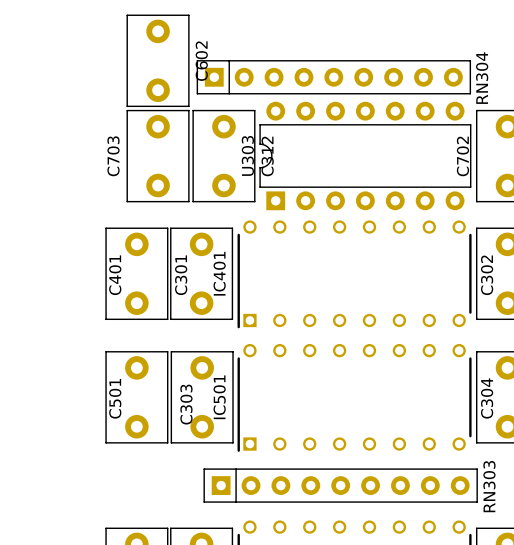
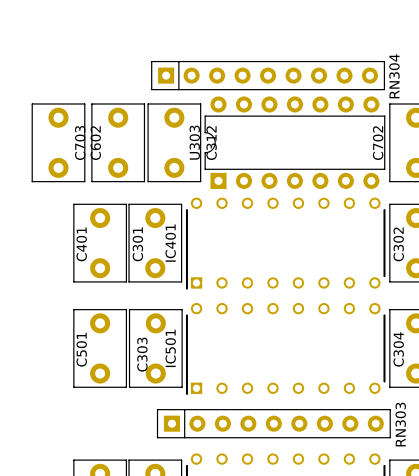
C602 position: (158, 60) -> (58, 142)

